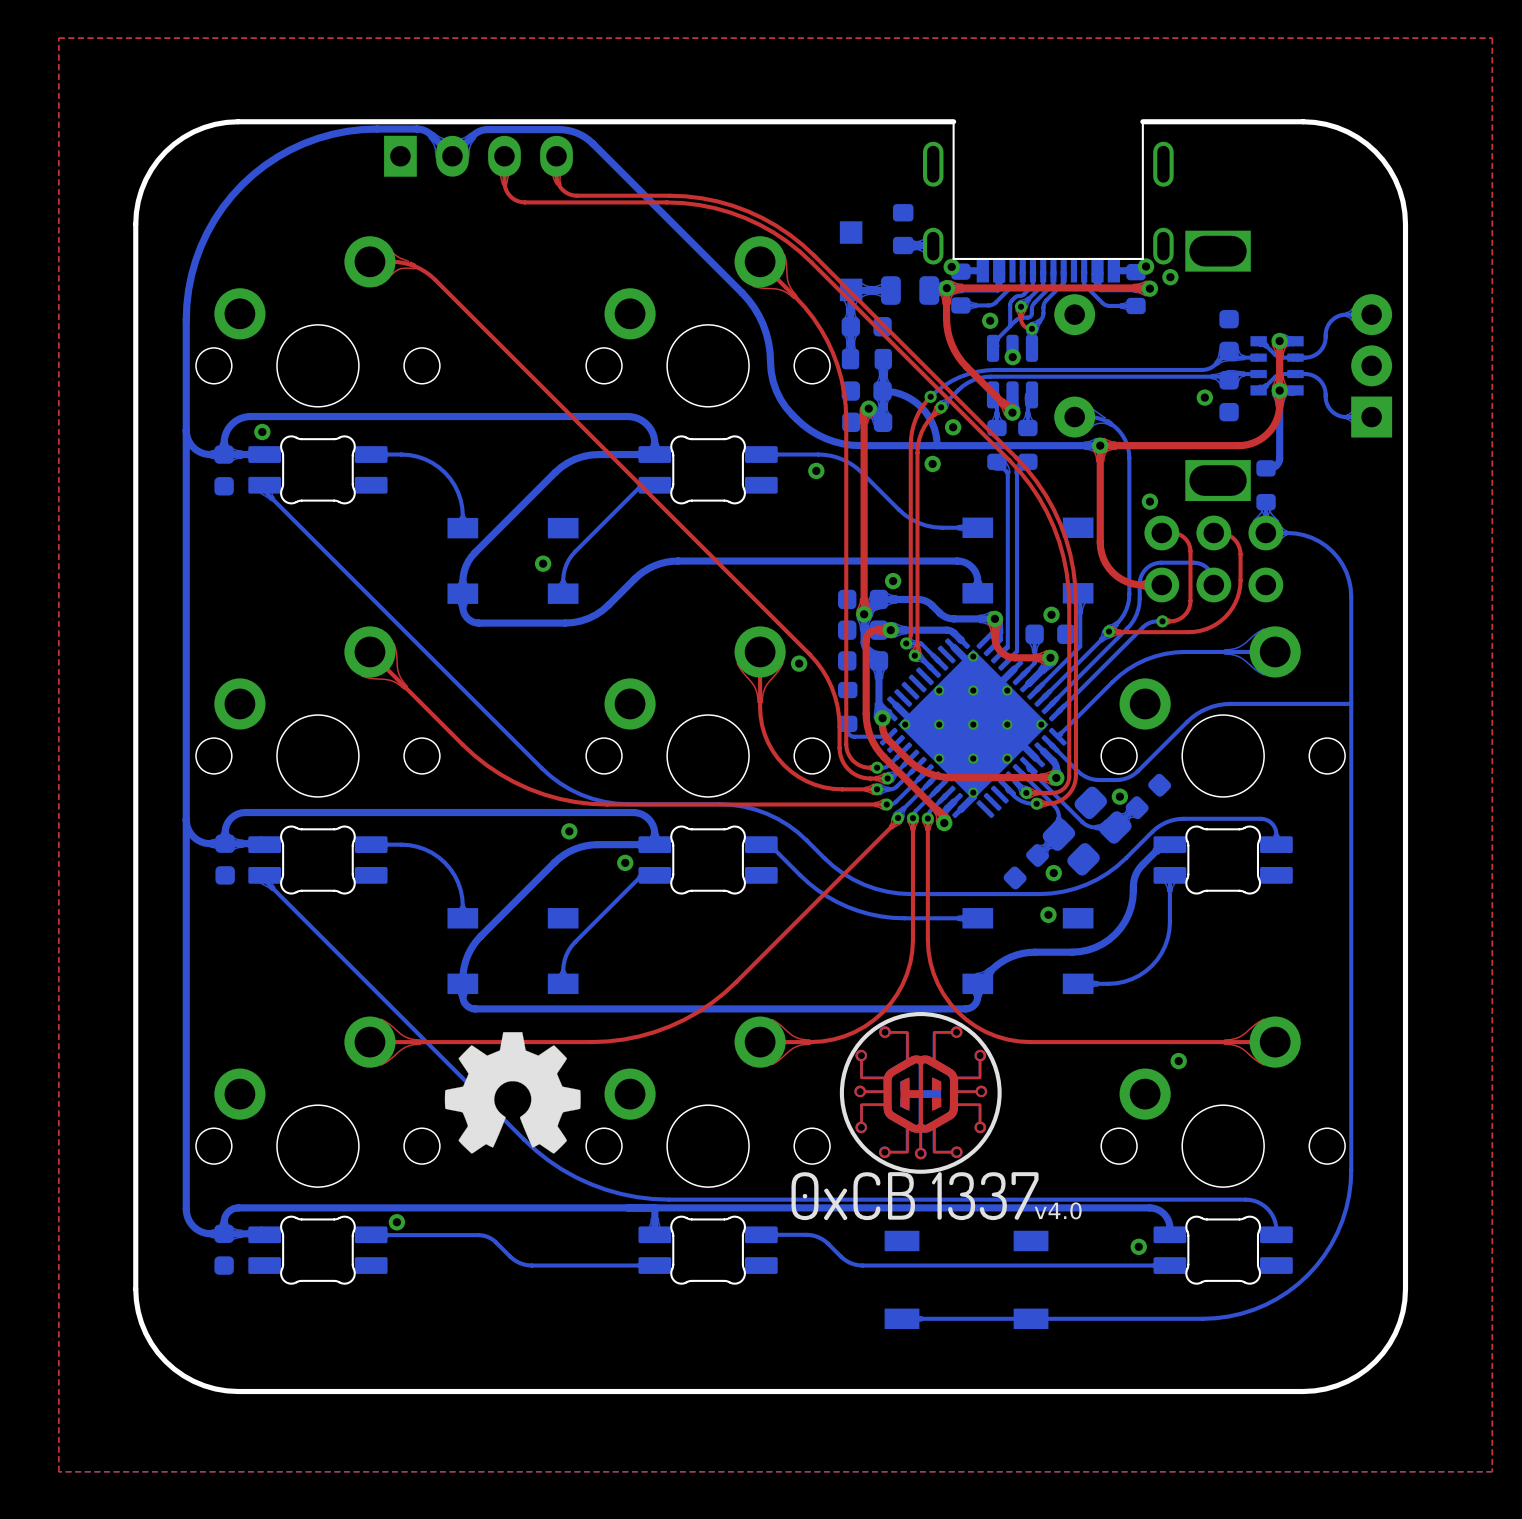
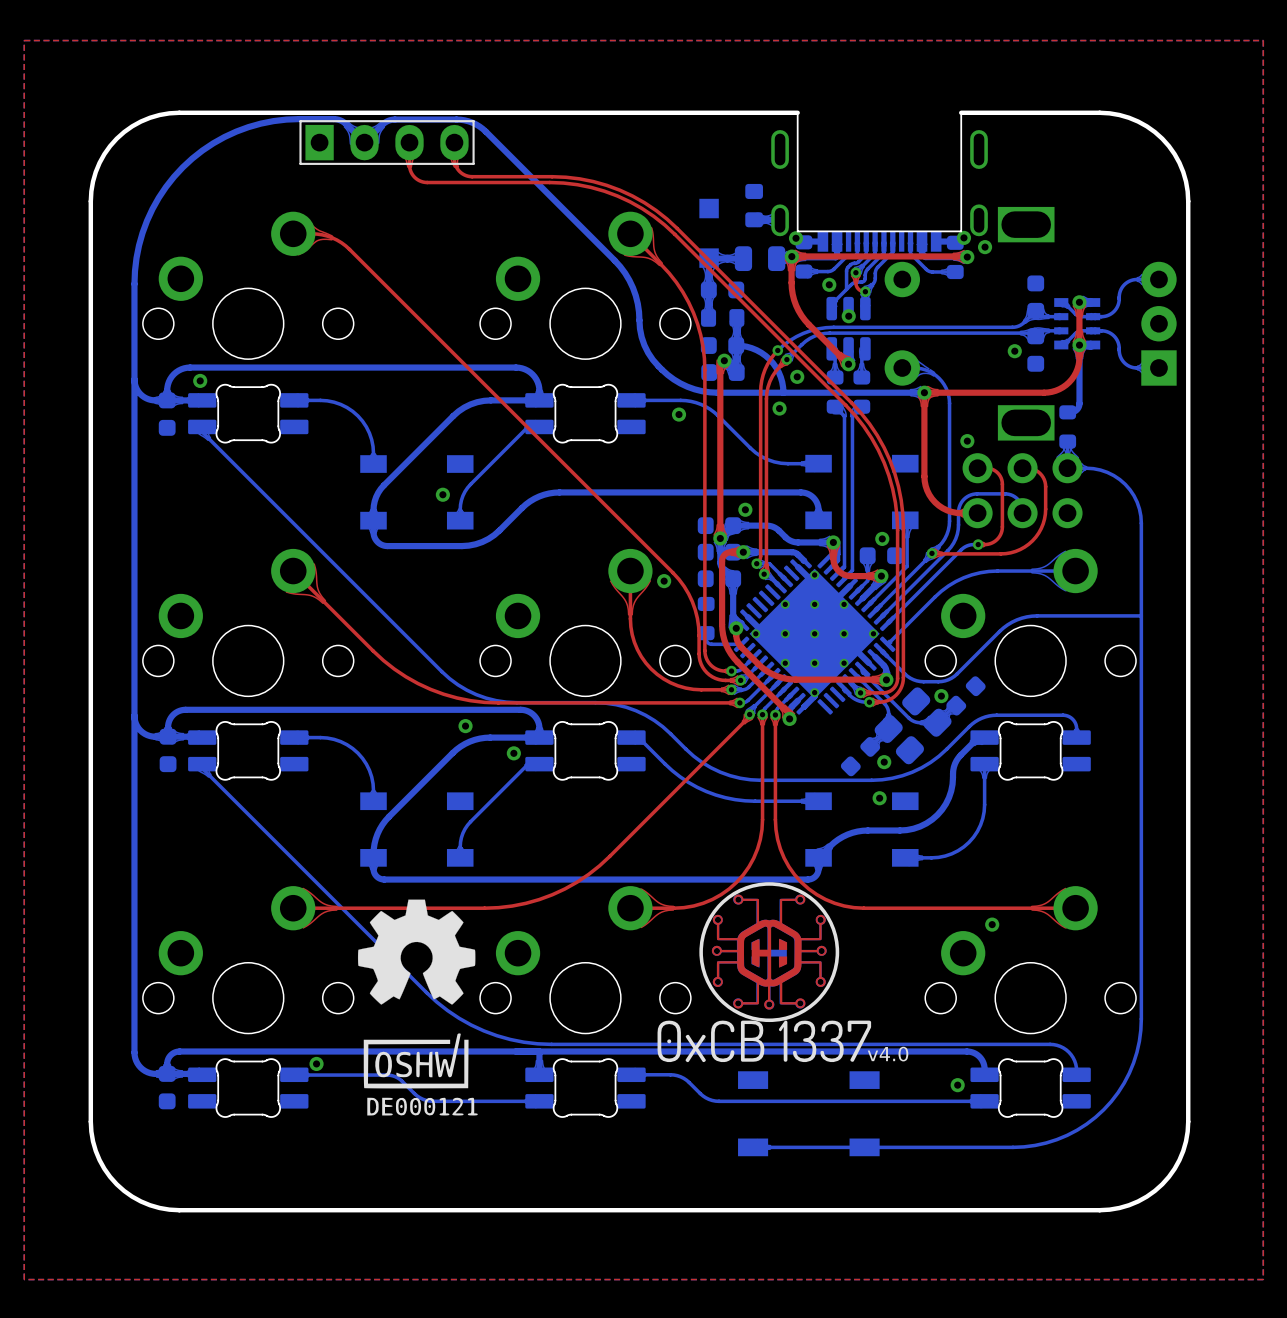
part footprint: [384, 135, 573, 177] -> [299, 120, 475, 165]
drawing: none -> [363, 1033, 478, 1116]

